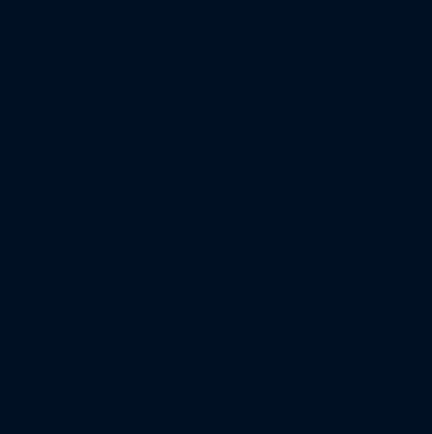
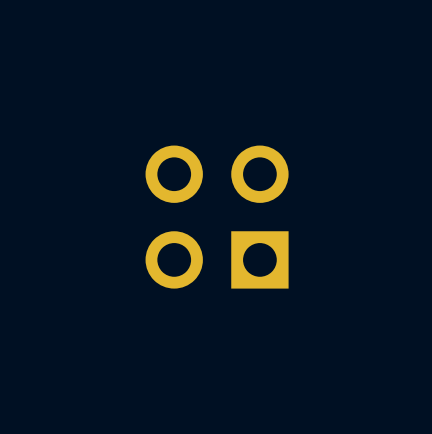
part: none -> (217, 217)

